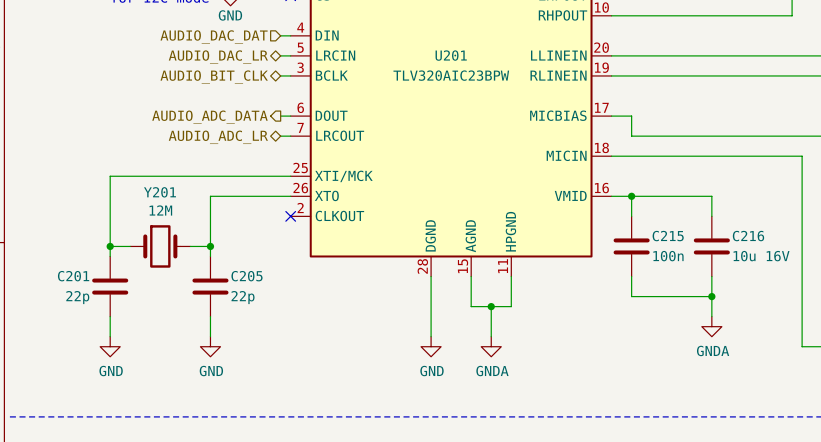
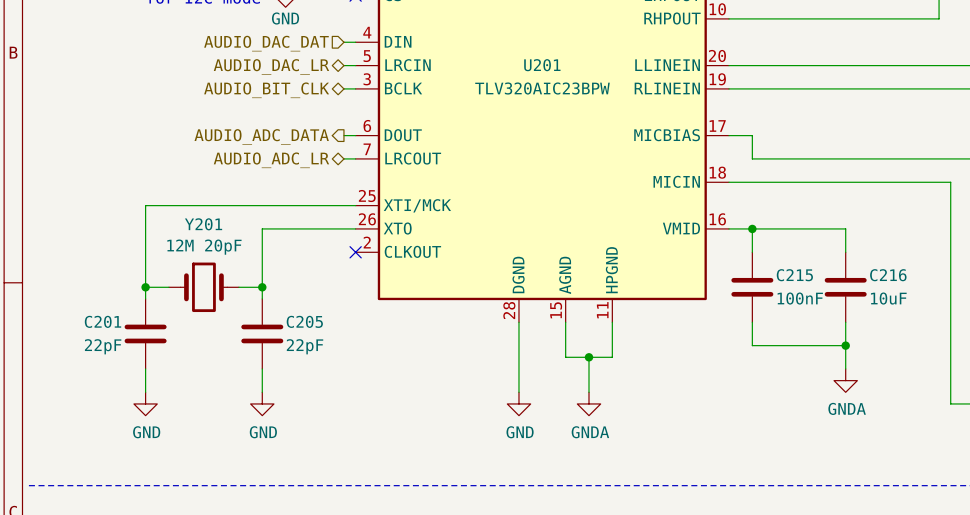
Y201 value: 12M (160, 210) -> 12M 20pF (204, 247)
C215 value: 100n (668, 256) -> 100nF (800, 298)
C216 value: 10u 16V (761, 256) -> 10uF (888, 298)
C201 value: 22p (77, 297) -> 22pF (103, 346)
C205 value: 22p (243, 297) -> 22pF (305, 346)

